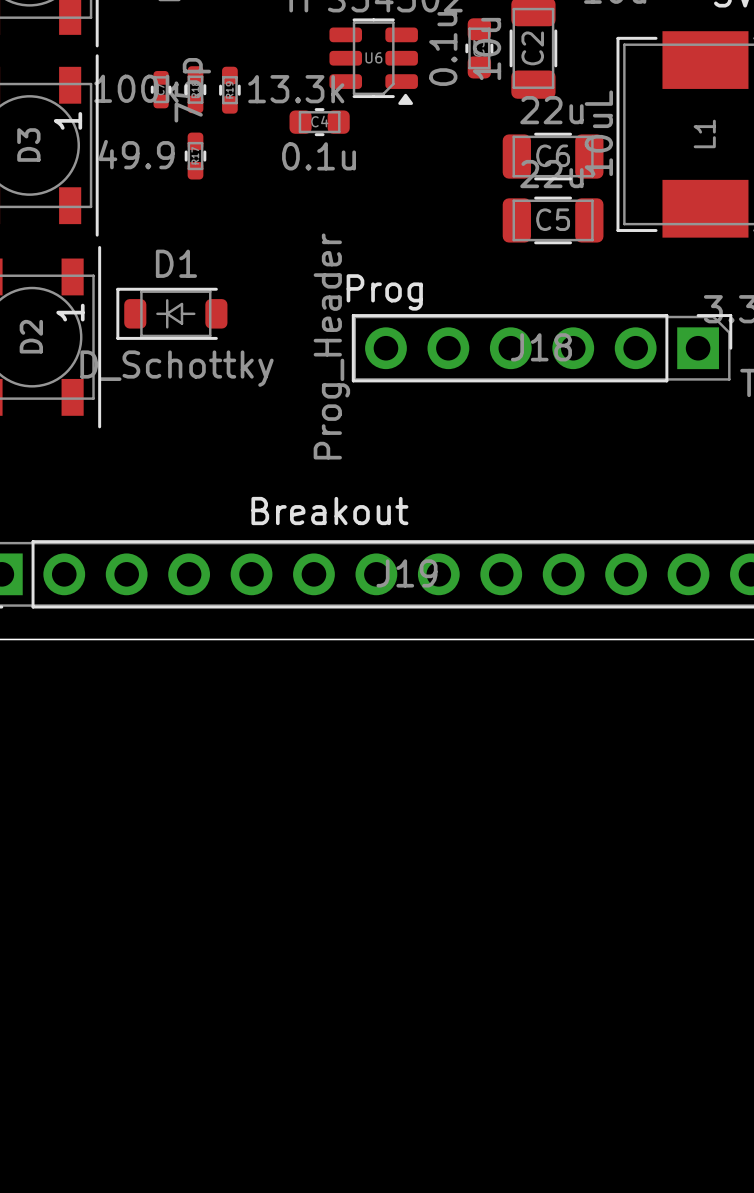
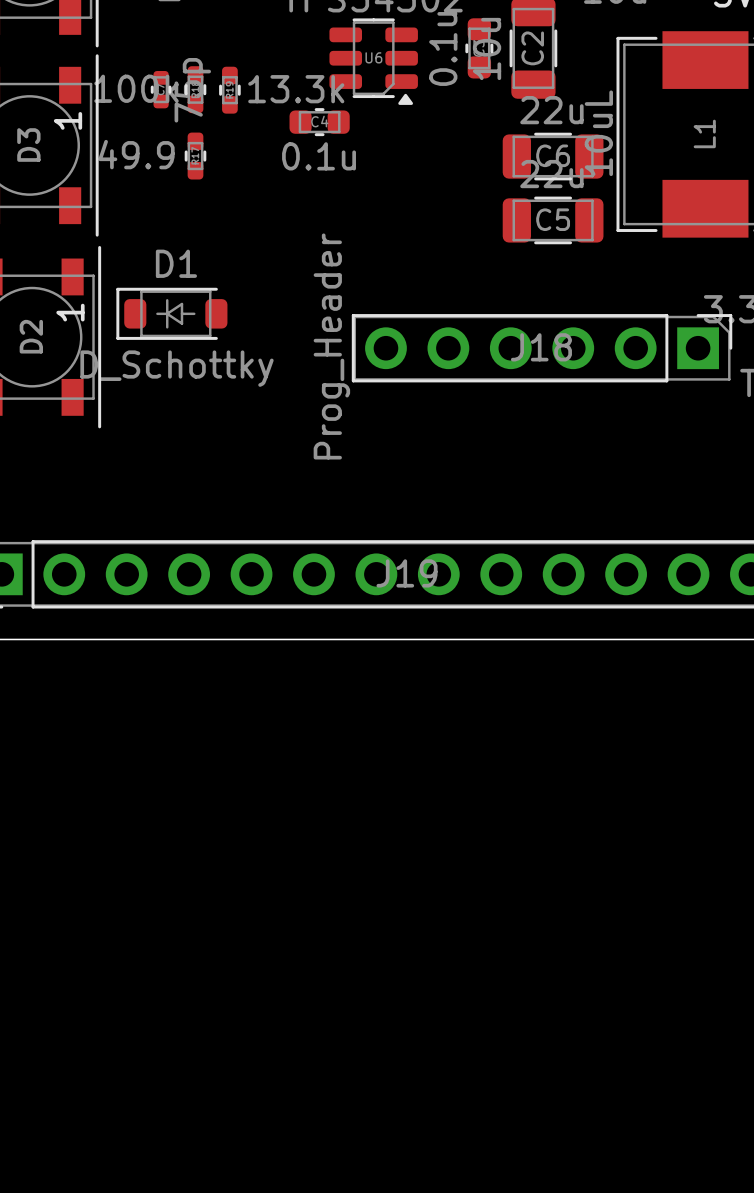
text: Prog (384, 292) -> none
text: Breakout (329, 511) -> none

